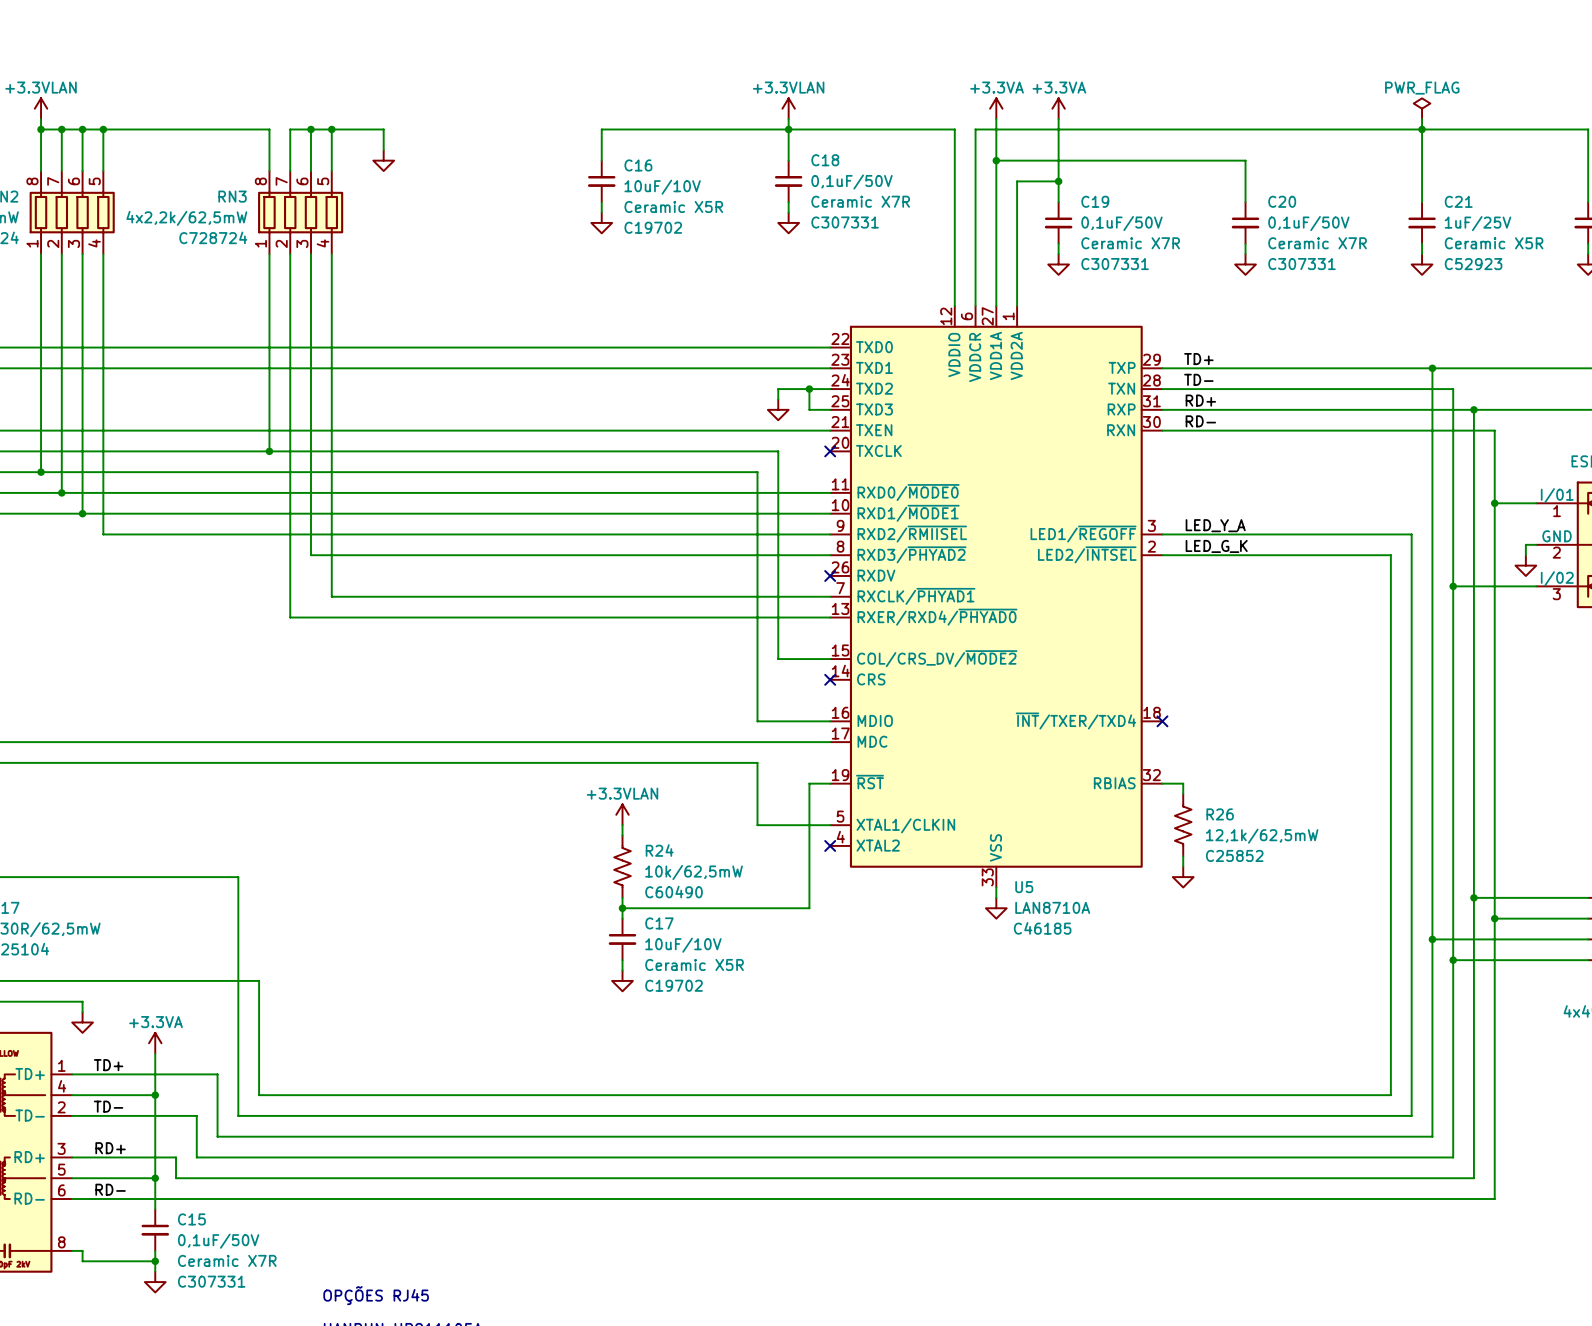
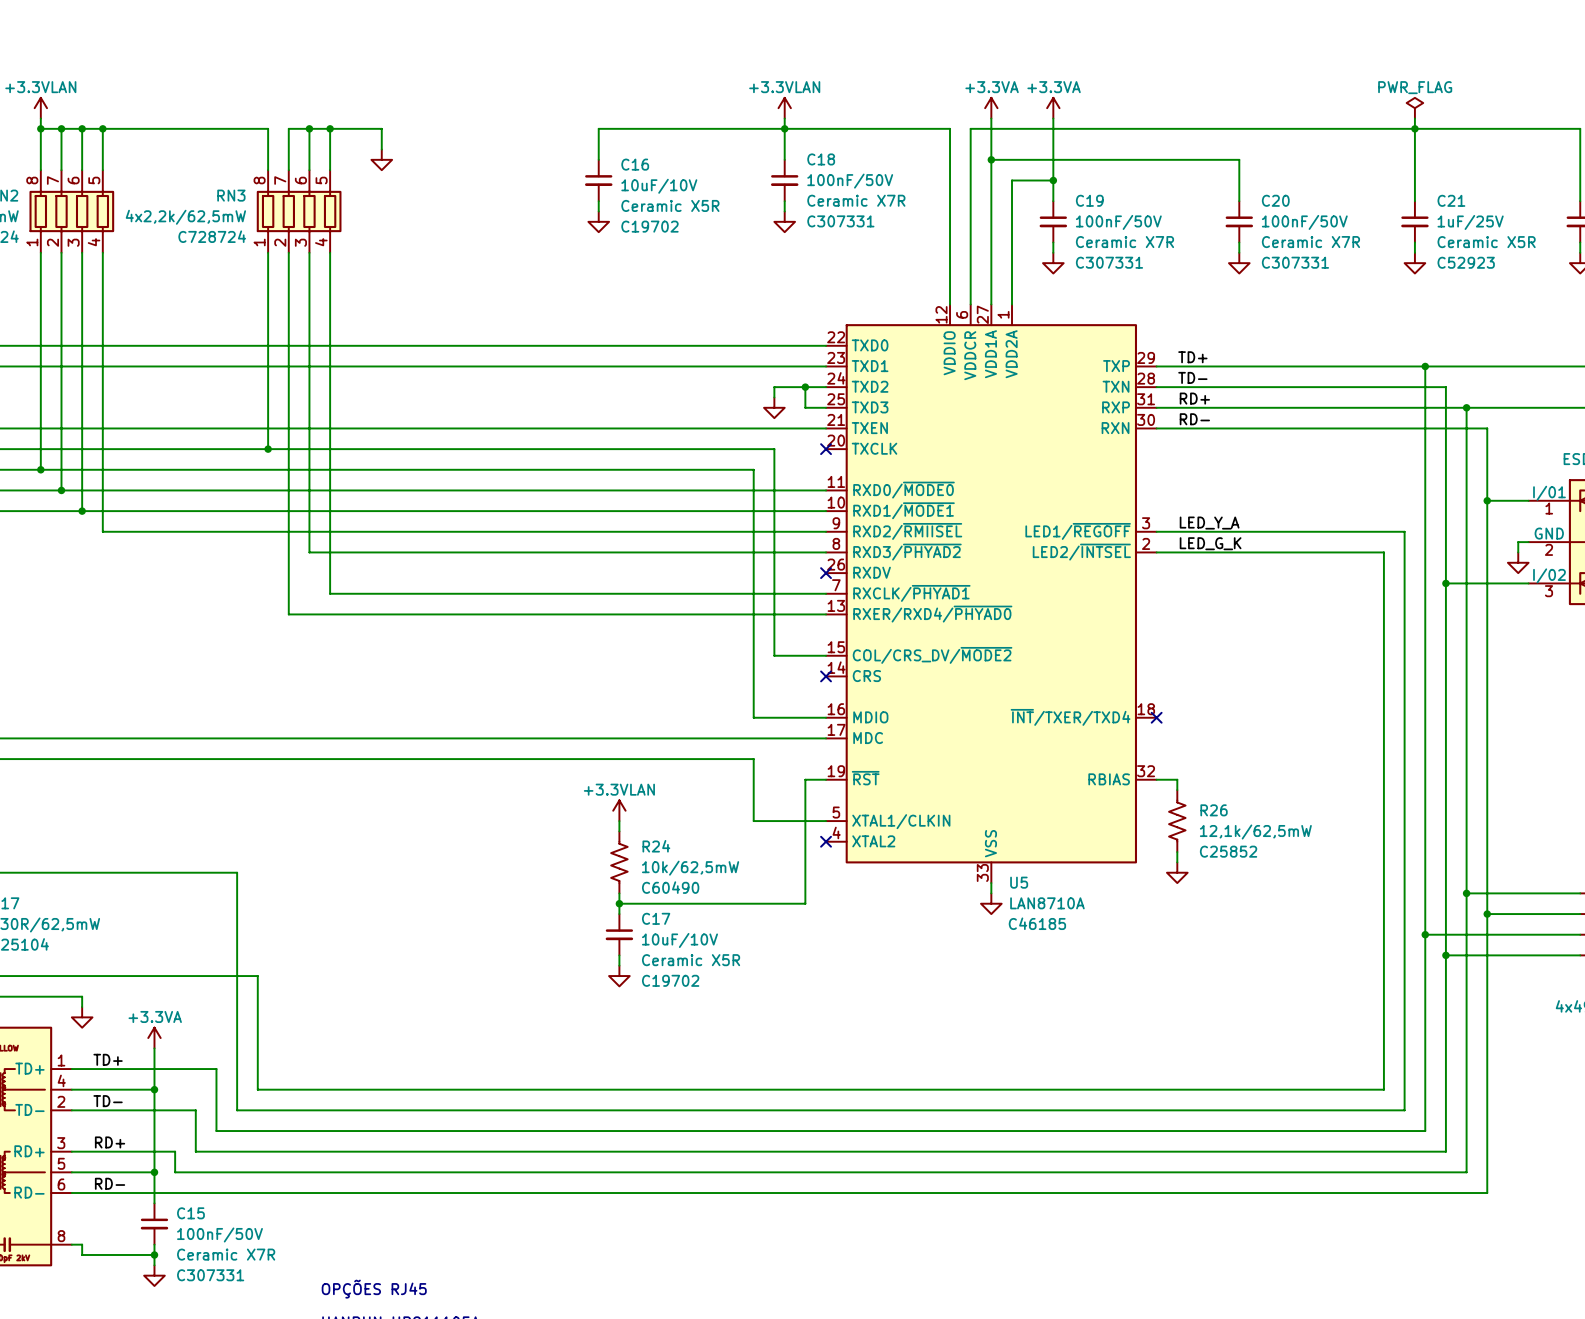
C18 value: 0,1uF/50V (852, 182) -> 100nF/50V (850, 181)
C19 value: 0,1uF/50V (1121, 223) -> 100nF/50V (1118, 222)
C20 value: 0,1uF/50V (1308, 223) -> 100nF/50V (1304, 222)
C15 value: 0,1uF/50V (218, 1241) -> 100nF/50V (219, 1234)

